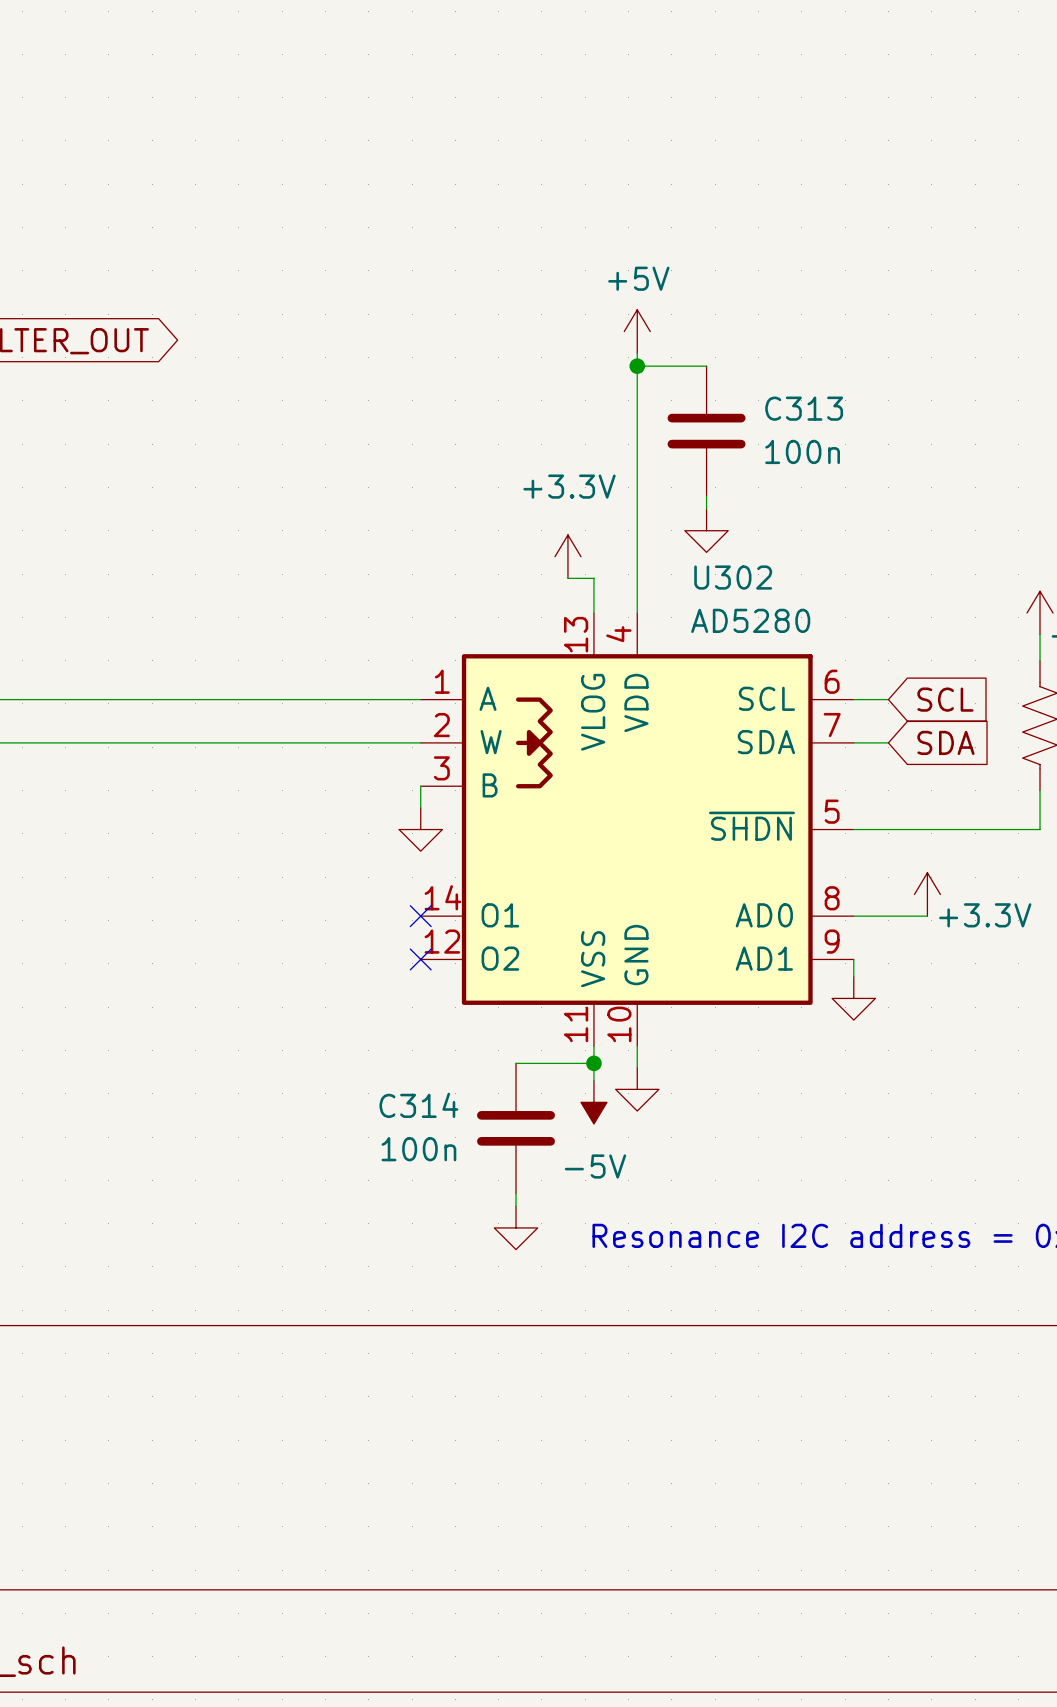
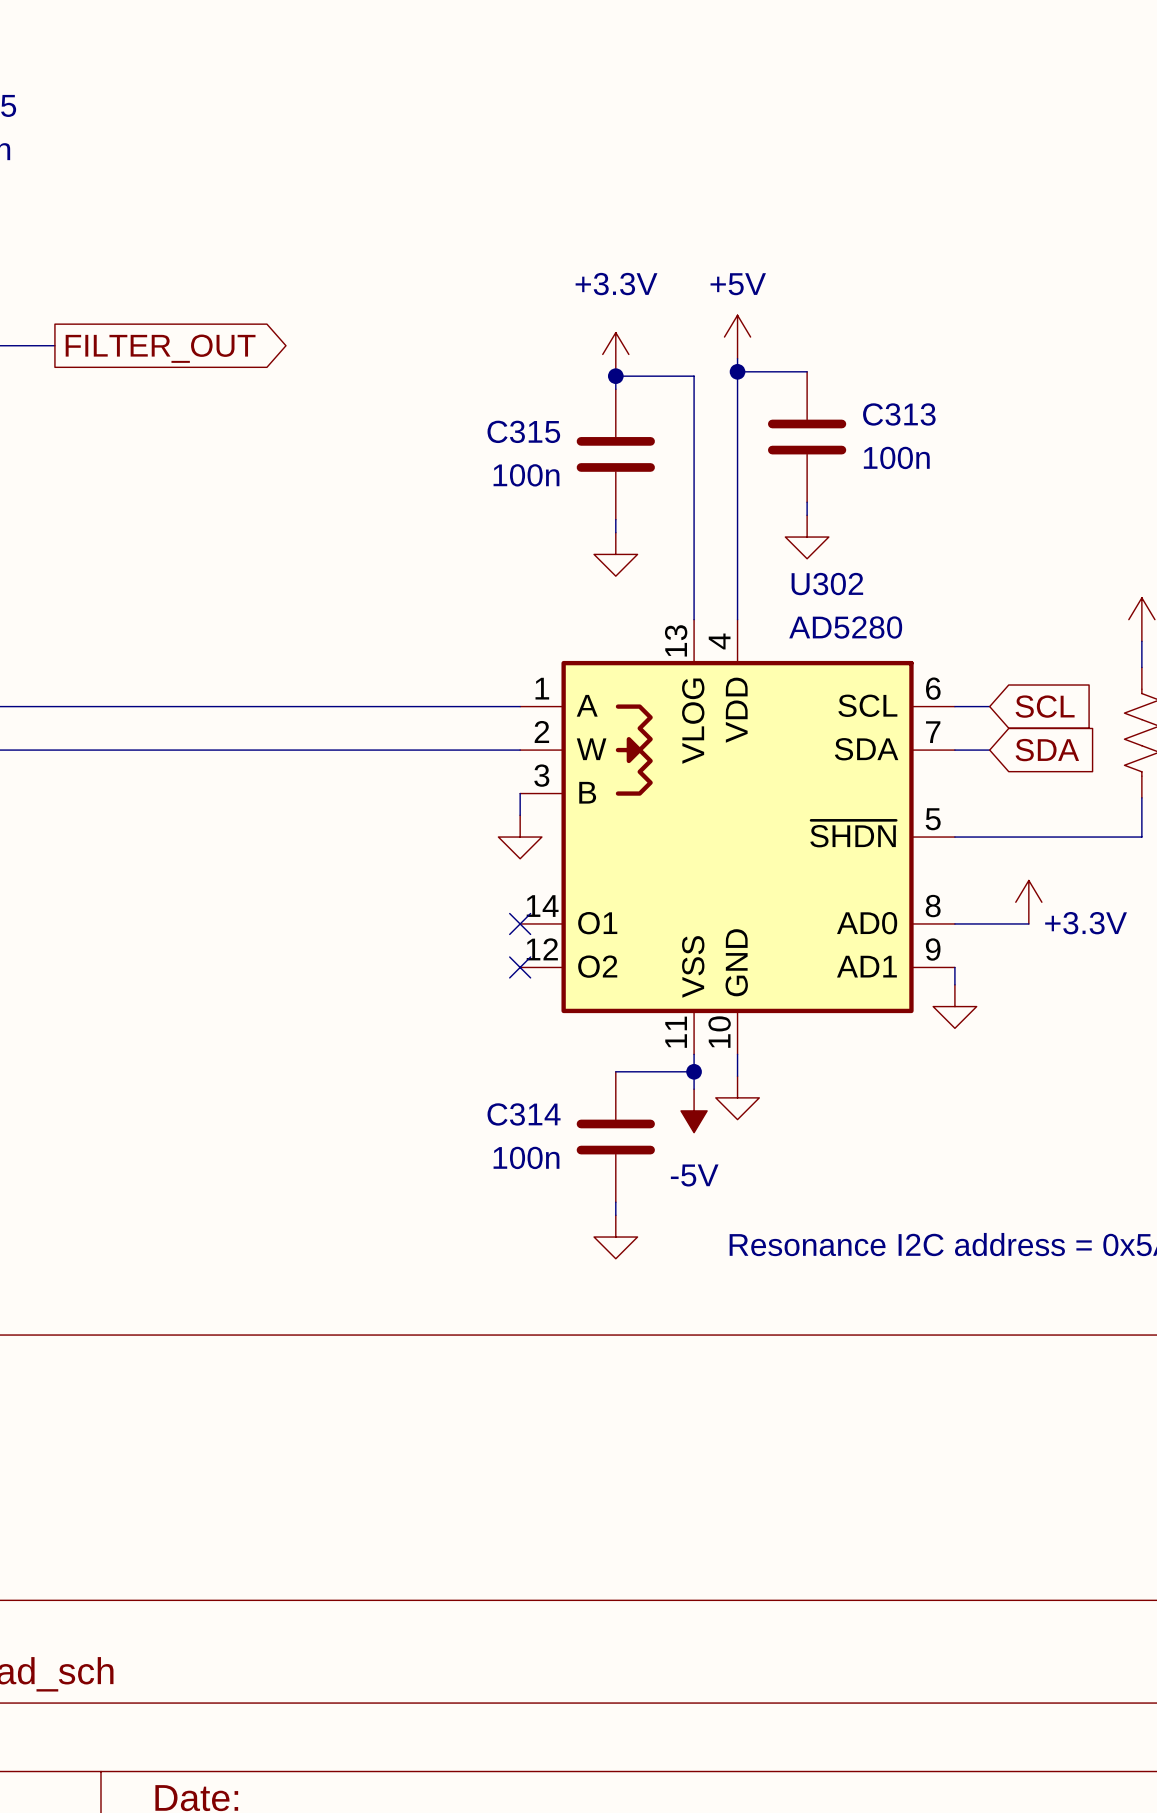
junction: none -> (615, 376)
C315: none -> 100n (615, 454)
wire: none -> (615, 519) (615, 532)
power symbol: none -> (615, 554)
power symbol position: +3.3V (567, 556) -> +3.3V (615, 354)
wire: (567, 578) (593, 578) -> (615, 389) (615, 376) (694, 376) (694, 584)

